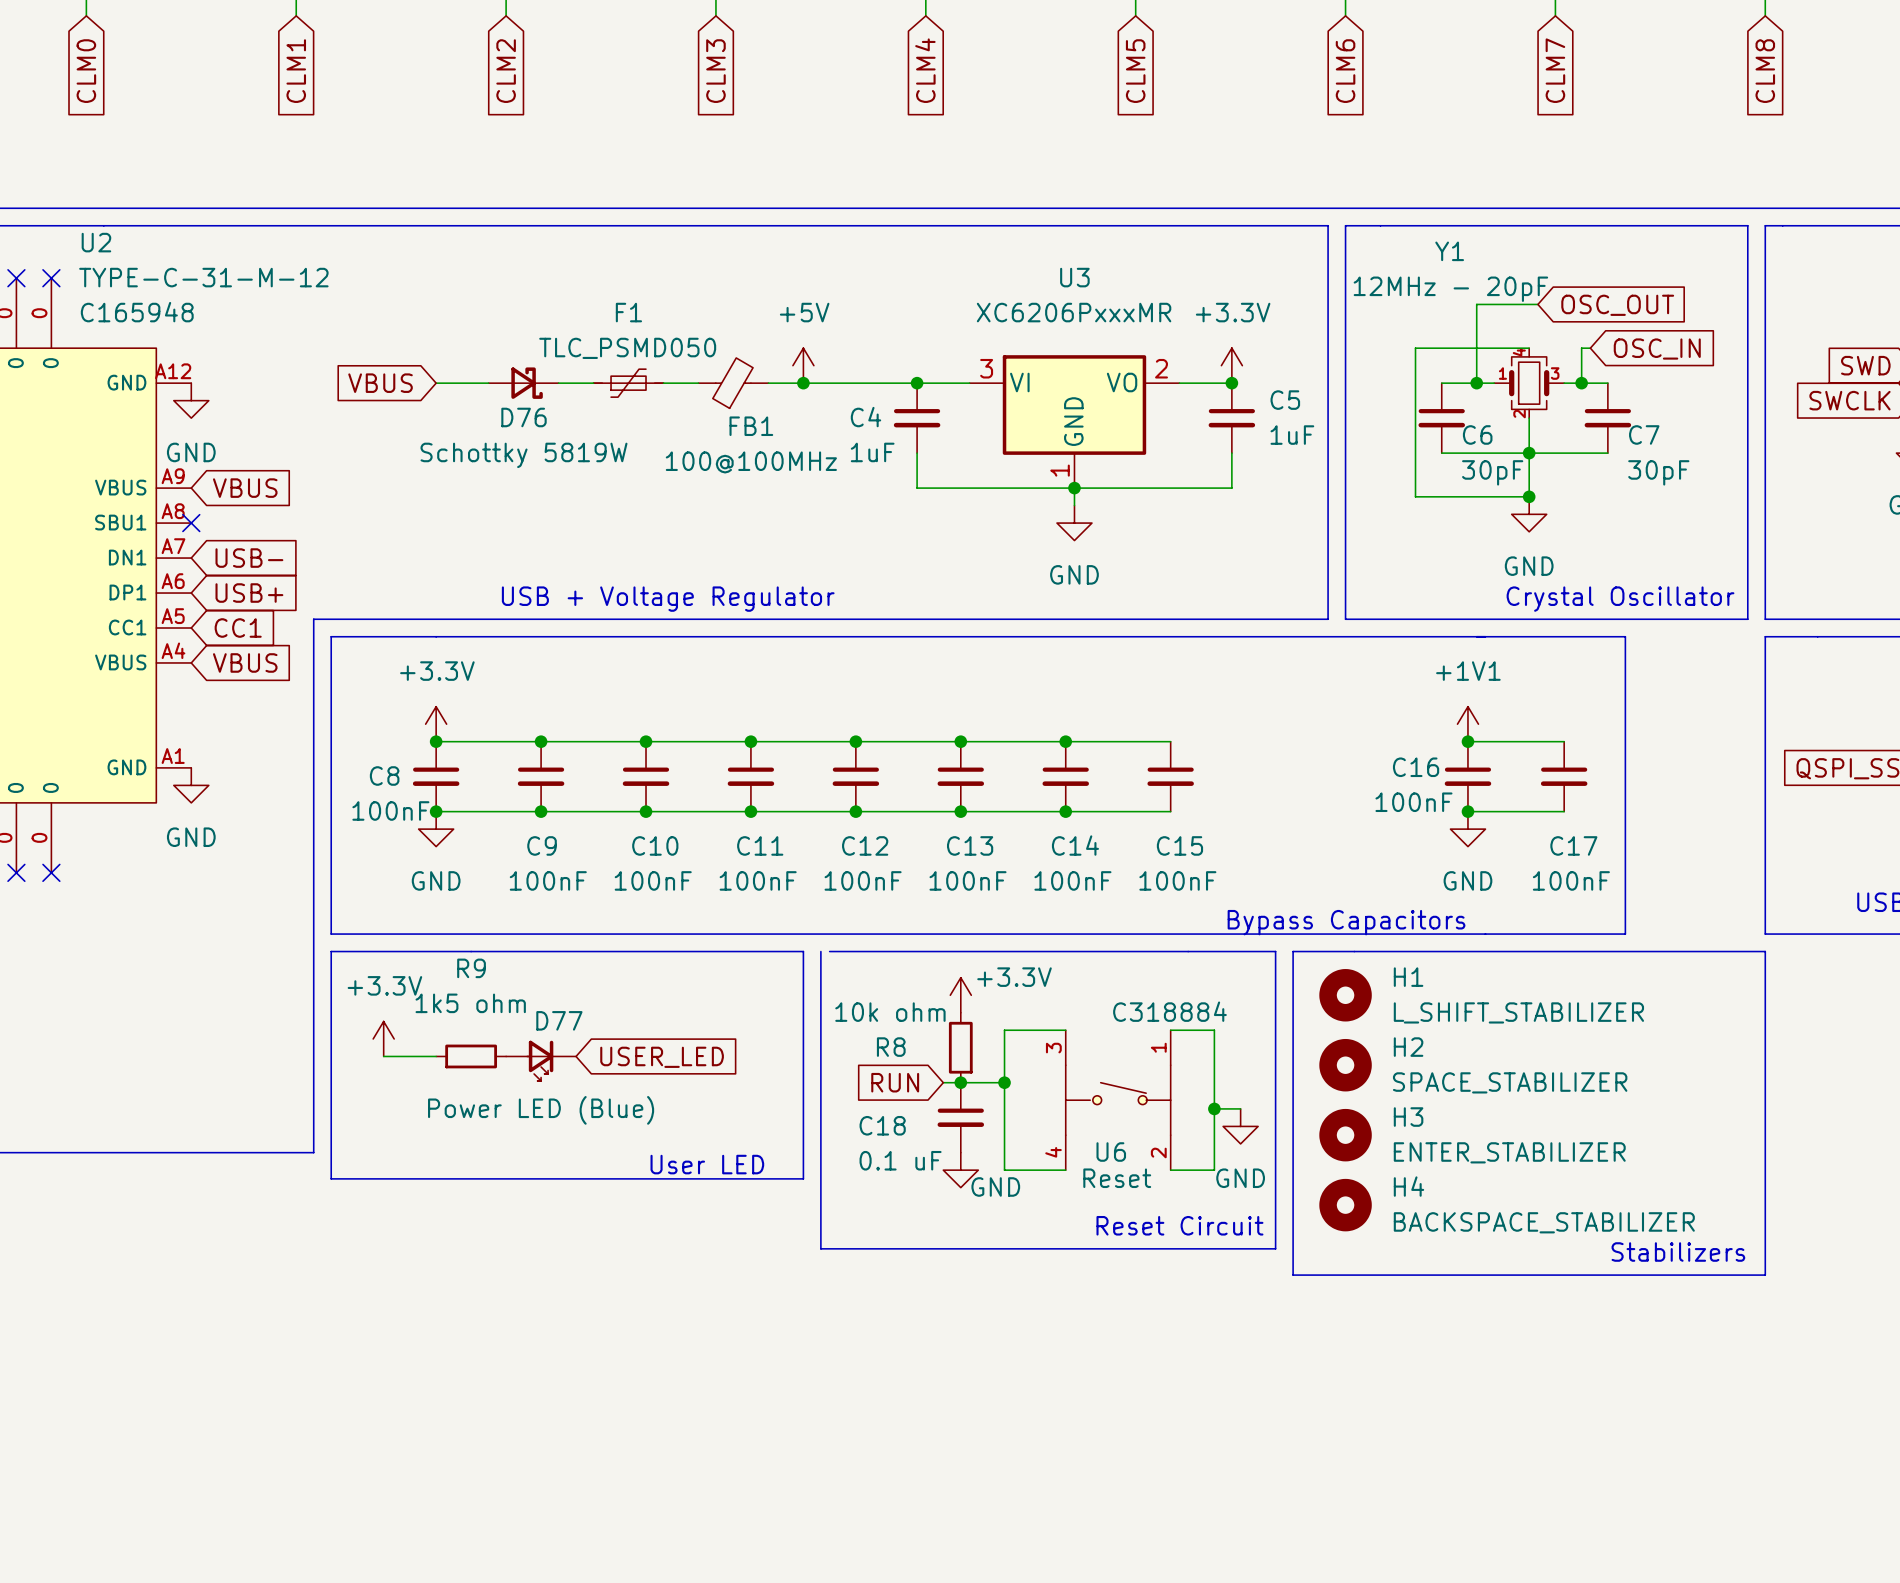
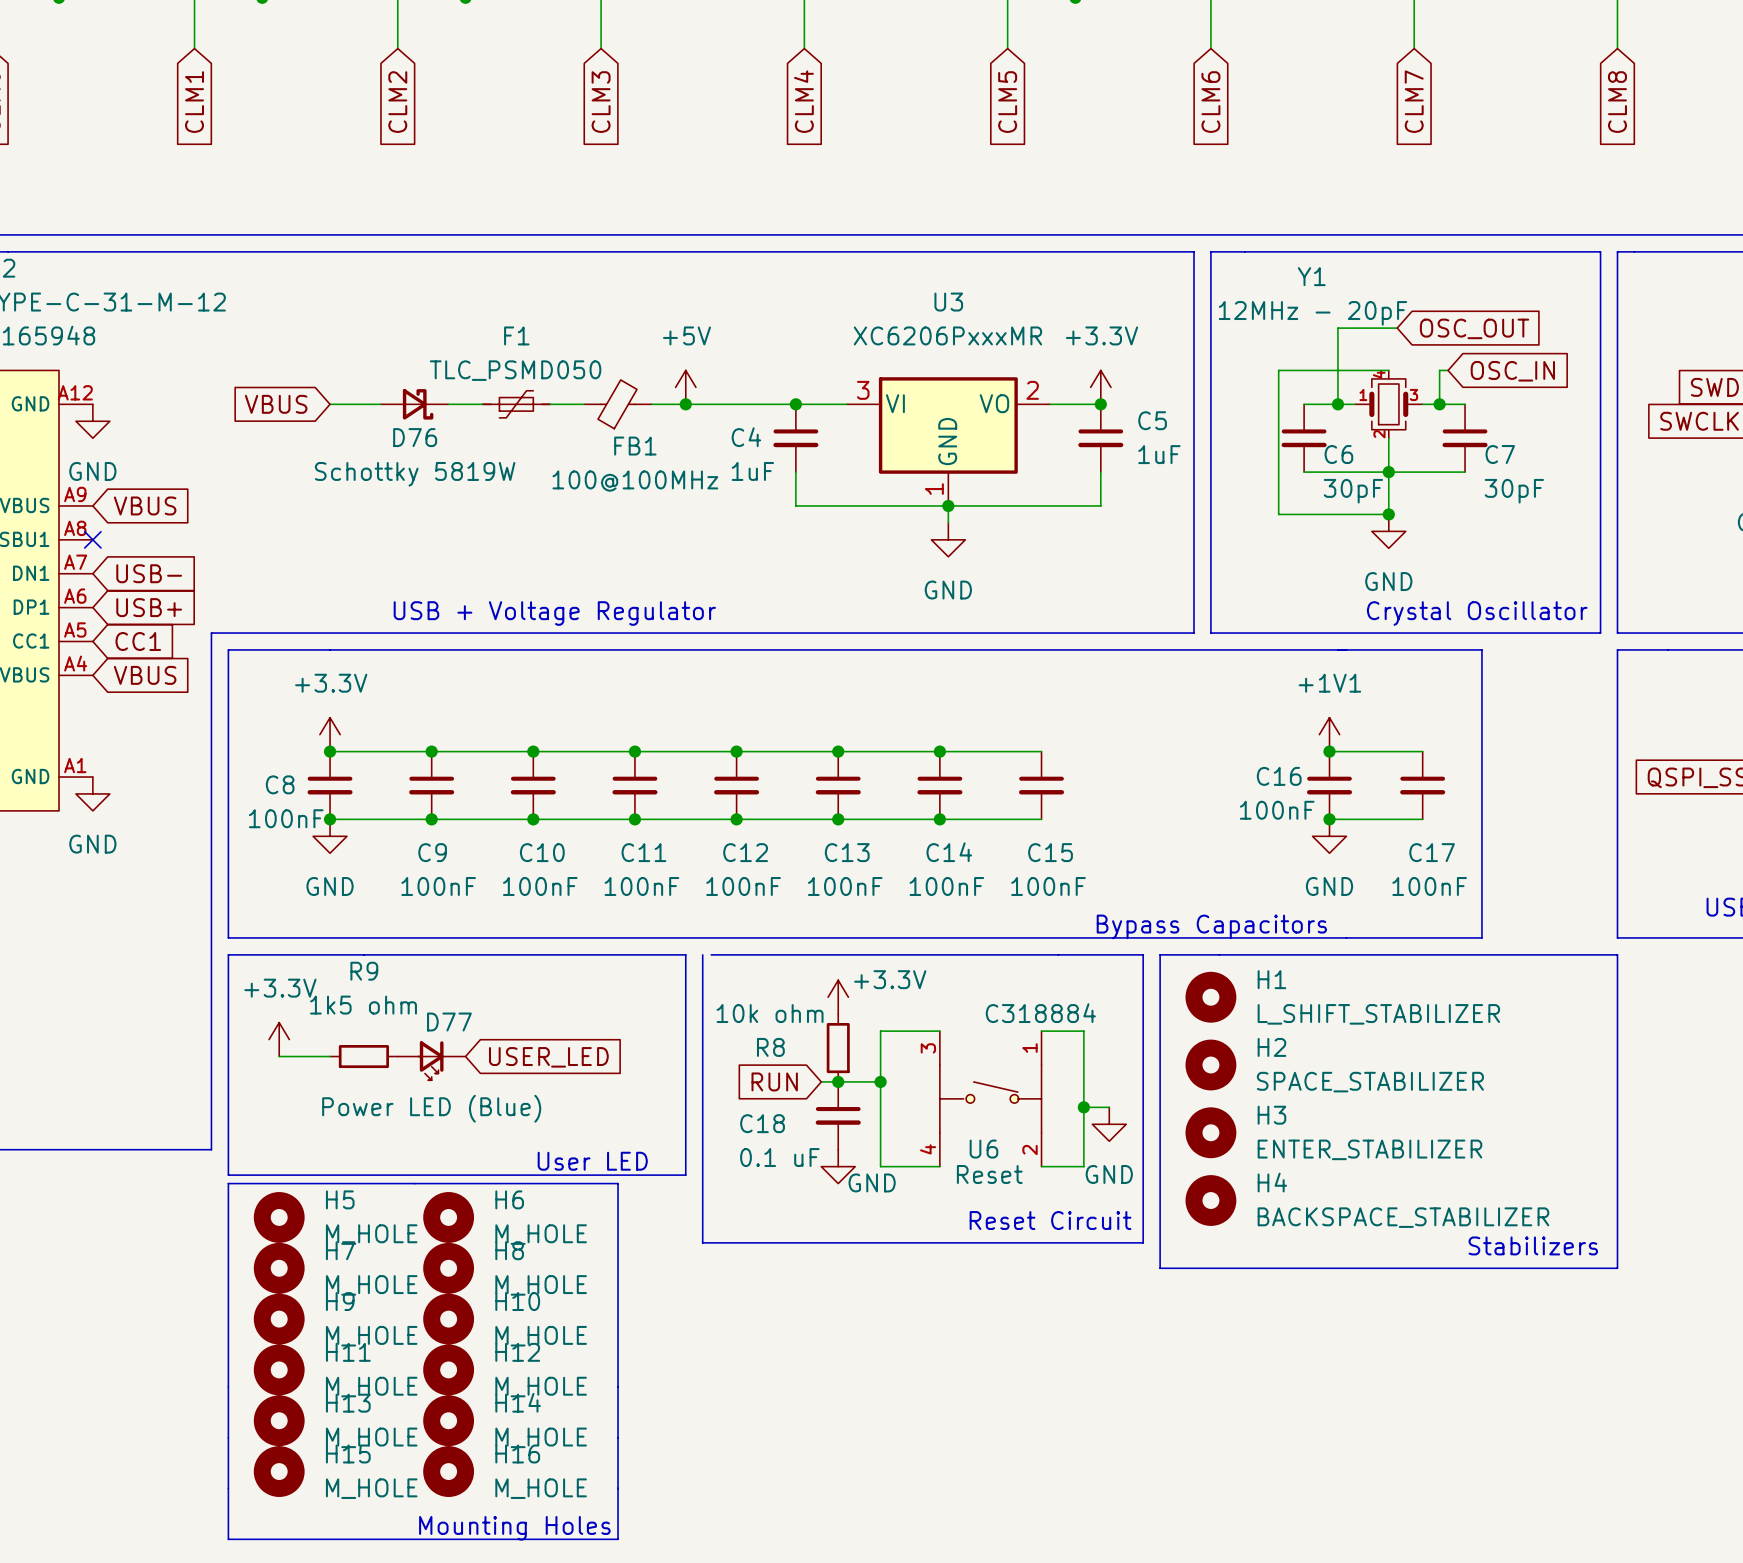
line: none -> (228, 1183) (618, 1183) (618, 1539) (228, 1539) (228, 1183)
H5: none -> M_HOLE (279, 1217)
H6: none -> M_HOLE (448, 1217)
H7: none -> M_HOLE (279, 1268)
H8: none -> M_HOLE (448, 1268)
H9: none -> M_HOLE (279, 1319)
H10: none -> M_HOLE (448, 1319)
H11: none -> M_HOLE (279, 1369)
H12: none -> M_HOLE (448, 1369)
H13: none -> M_HOLE (279, 1420)
H14: none -> M_HOLE (448, 1420)
H15: none -> M_HOLE (279, 1471)
H16: none -> M_HOLE (448, 1471)
text: none -> Mounting Holes (514, 1528)

